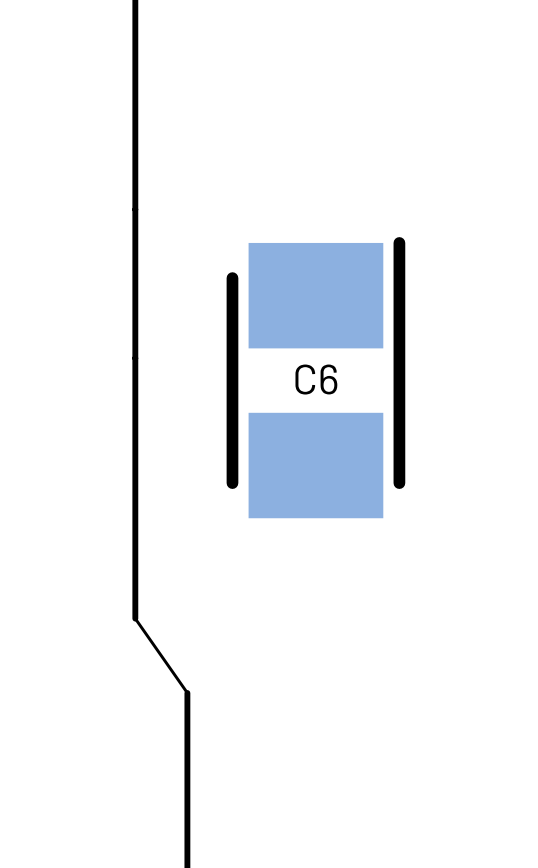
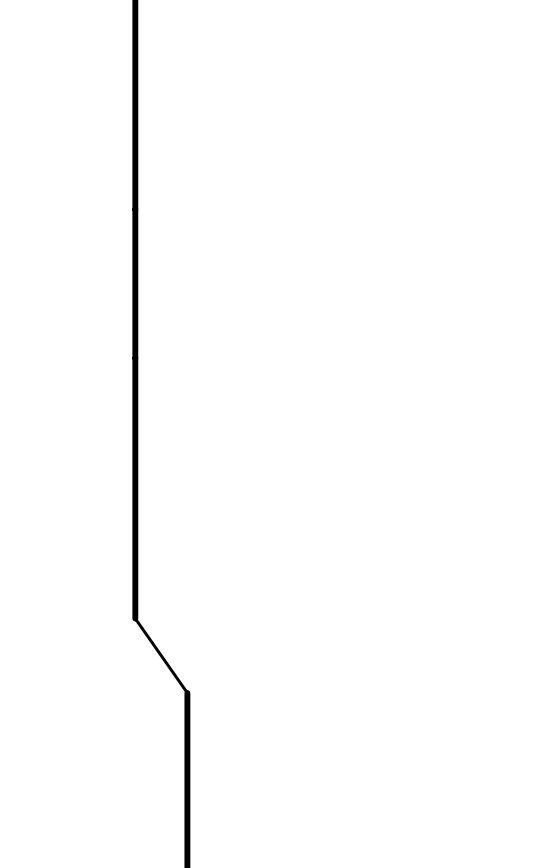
C6: (315, 377) -> none

